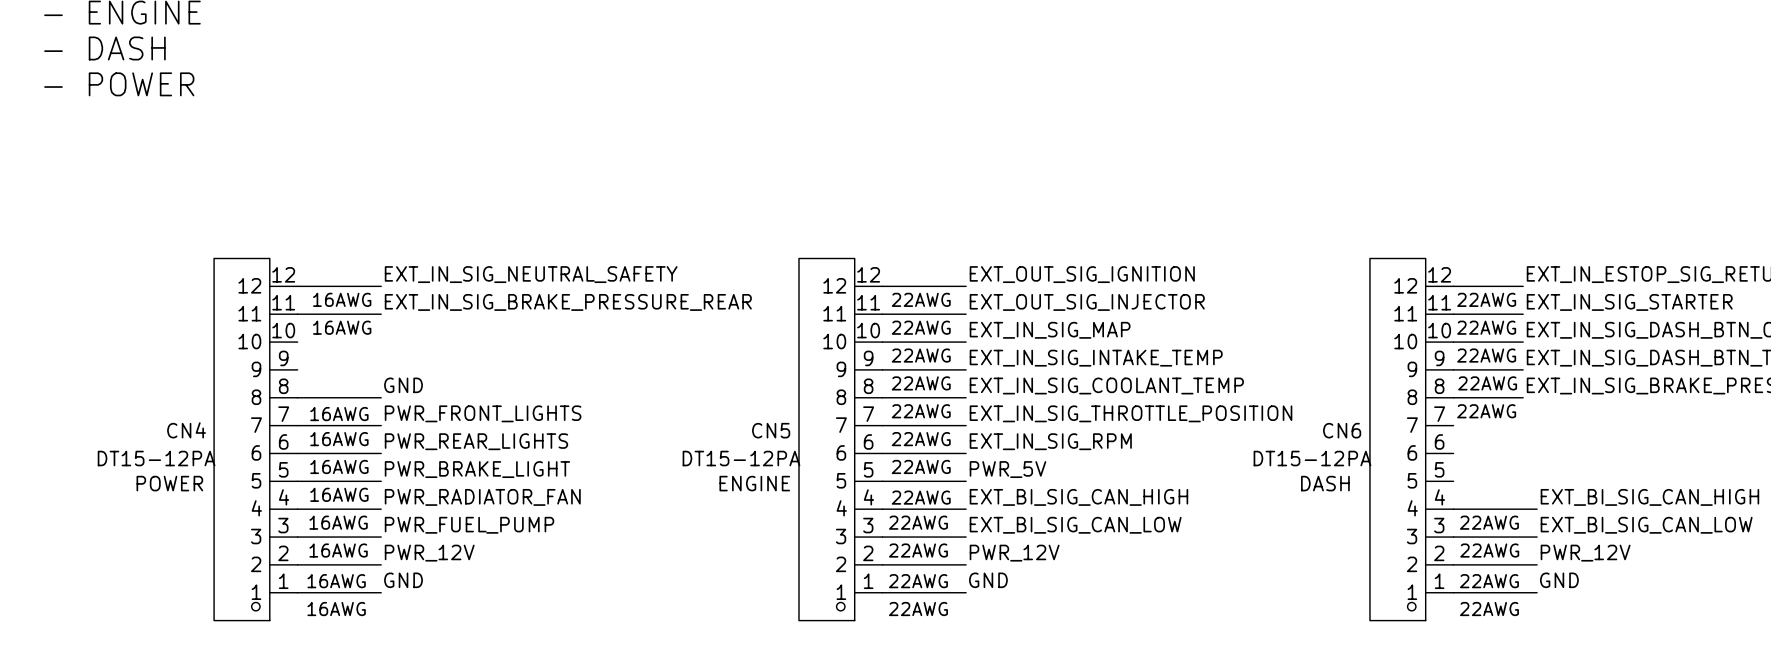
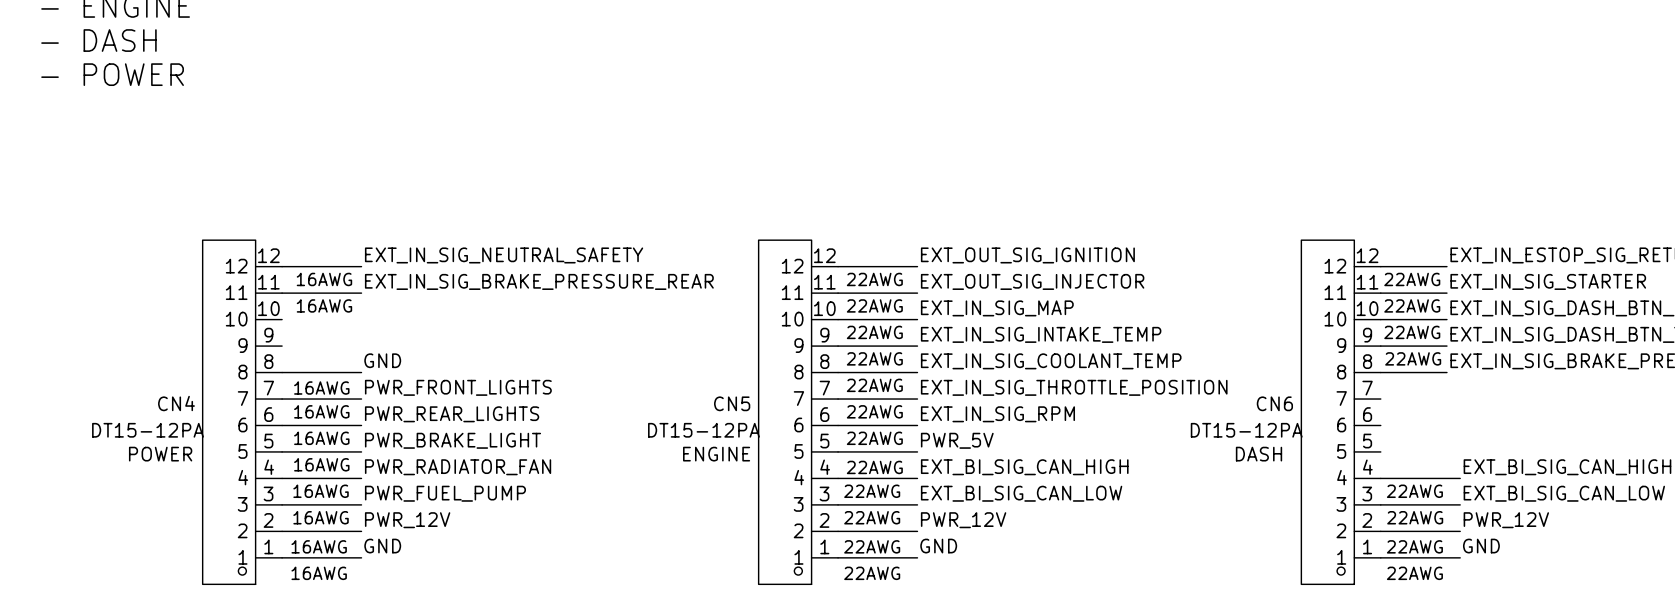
text: 22AWG (1486, 411) -> none

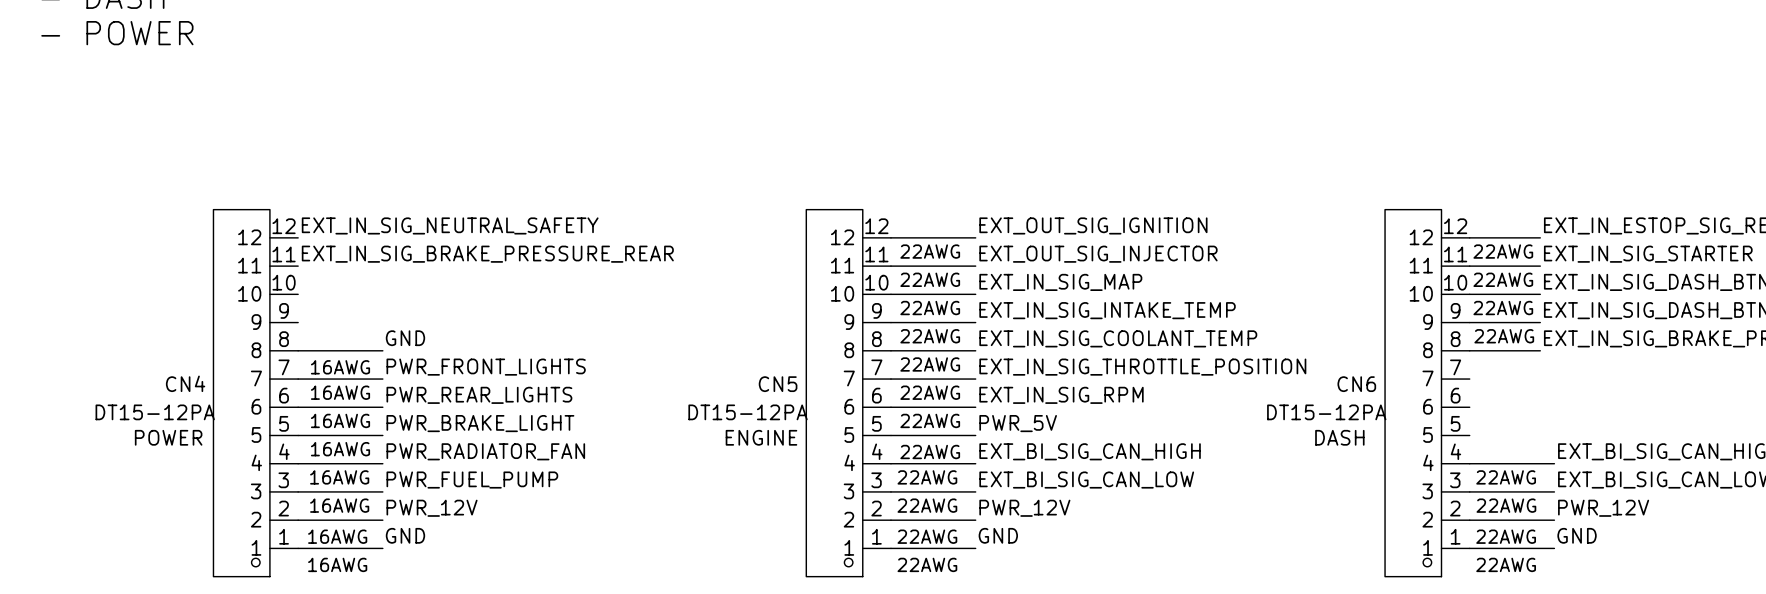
label position: EXT_IN_SIG_NEUTRAL_SAFETY (504, 255) -> EXT_IN_SIG_NEUTRAL_SAFETY (450, 225)
wire: (282, 266) (361, 266) -> none
text: 16AWG (324, 279) -> none
label position: EXT_IN_SIG_BRAKE_PRESSURE_REAR (539, 281) -> EXT_IN_SIG_BRAKE_PRESSURE_REAR (487, 254)
wire: (282, 293) (361, 293) -> none
text: 16AWG (324, 305) -> none

